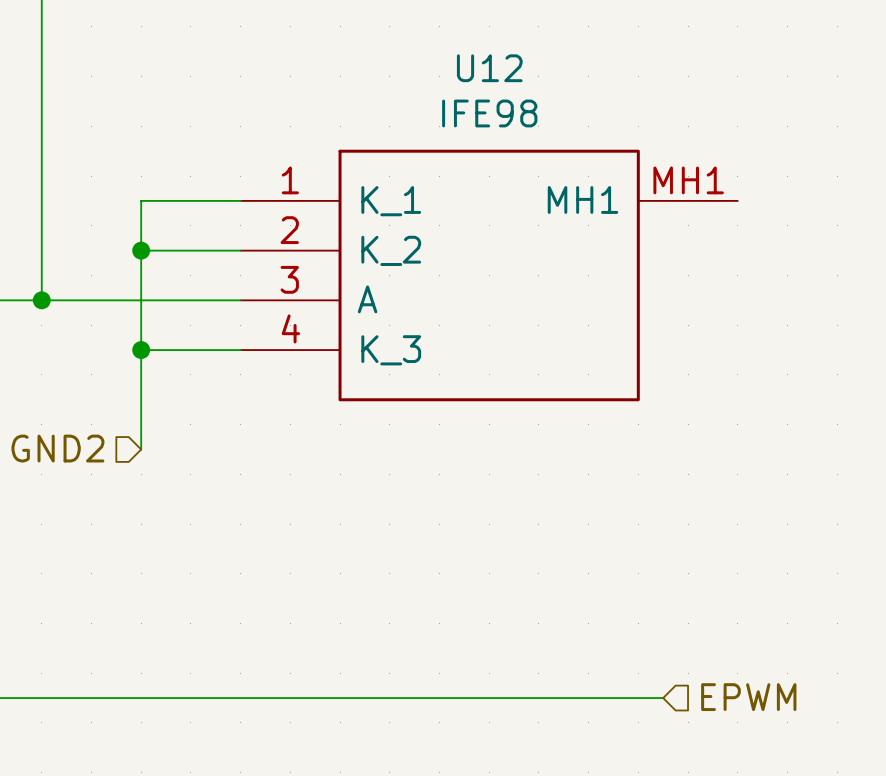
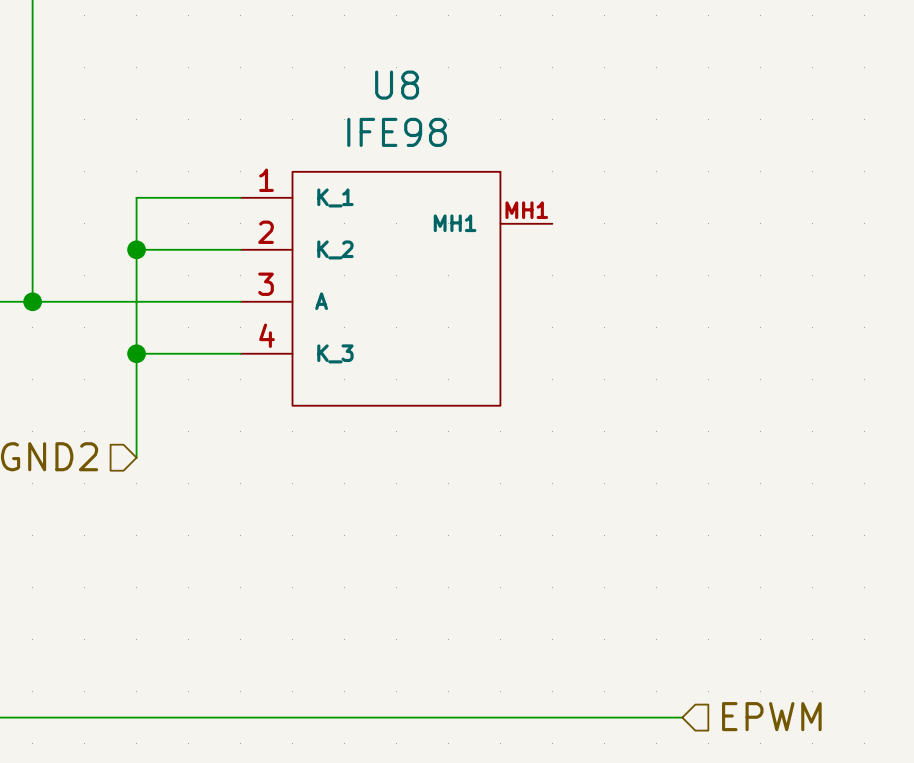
U12: IFE98 (489, 275) -> none
U8: none -> IFE98 (396, 288)

